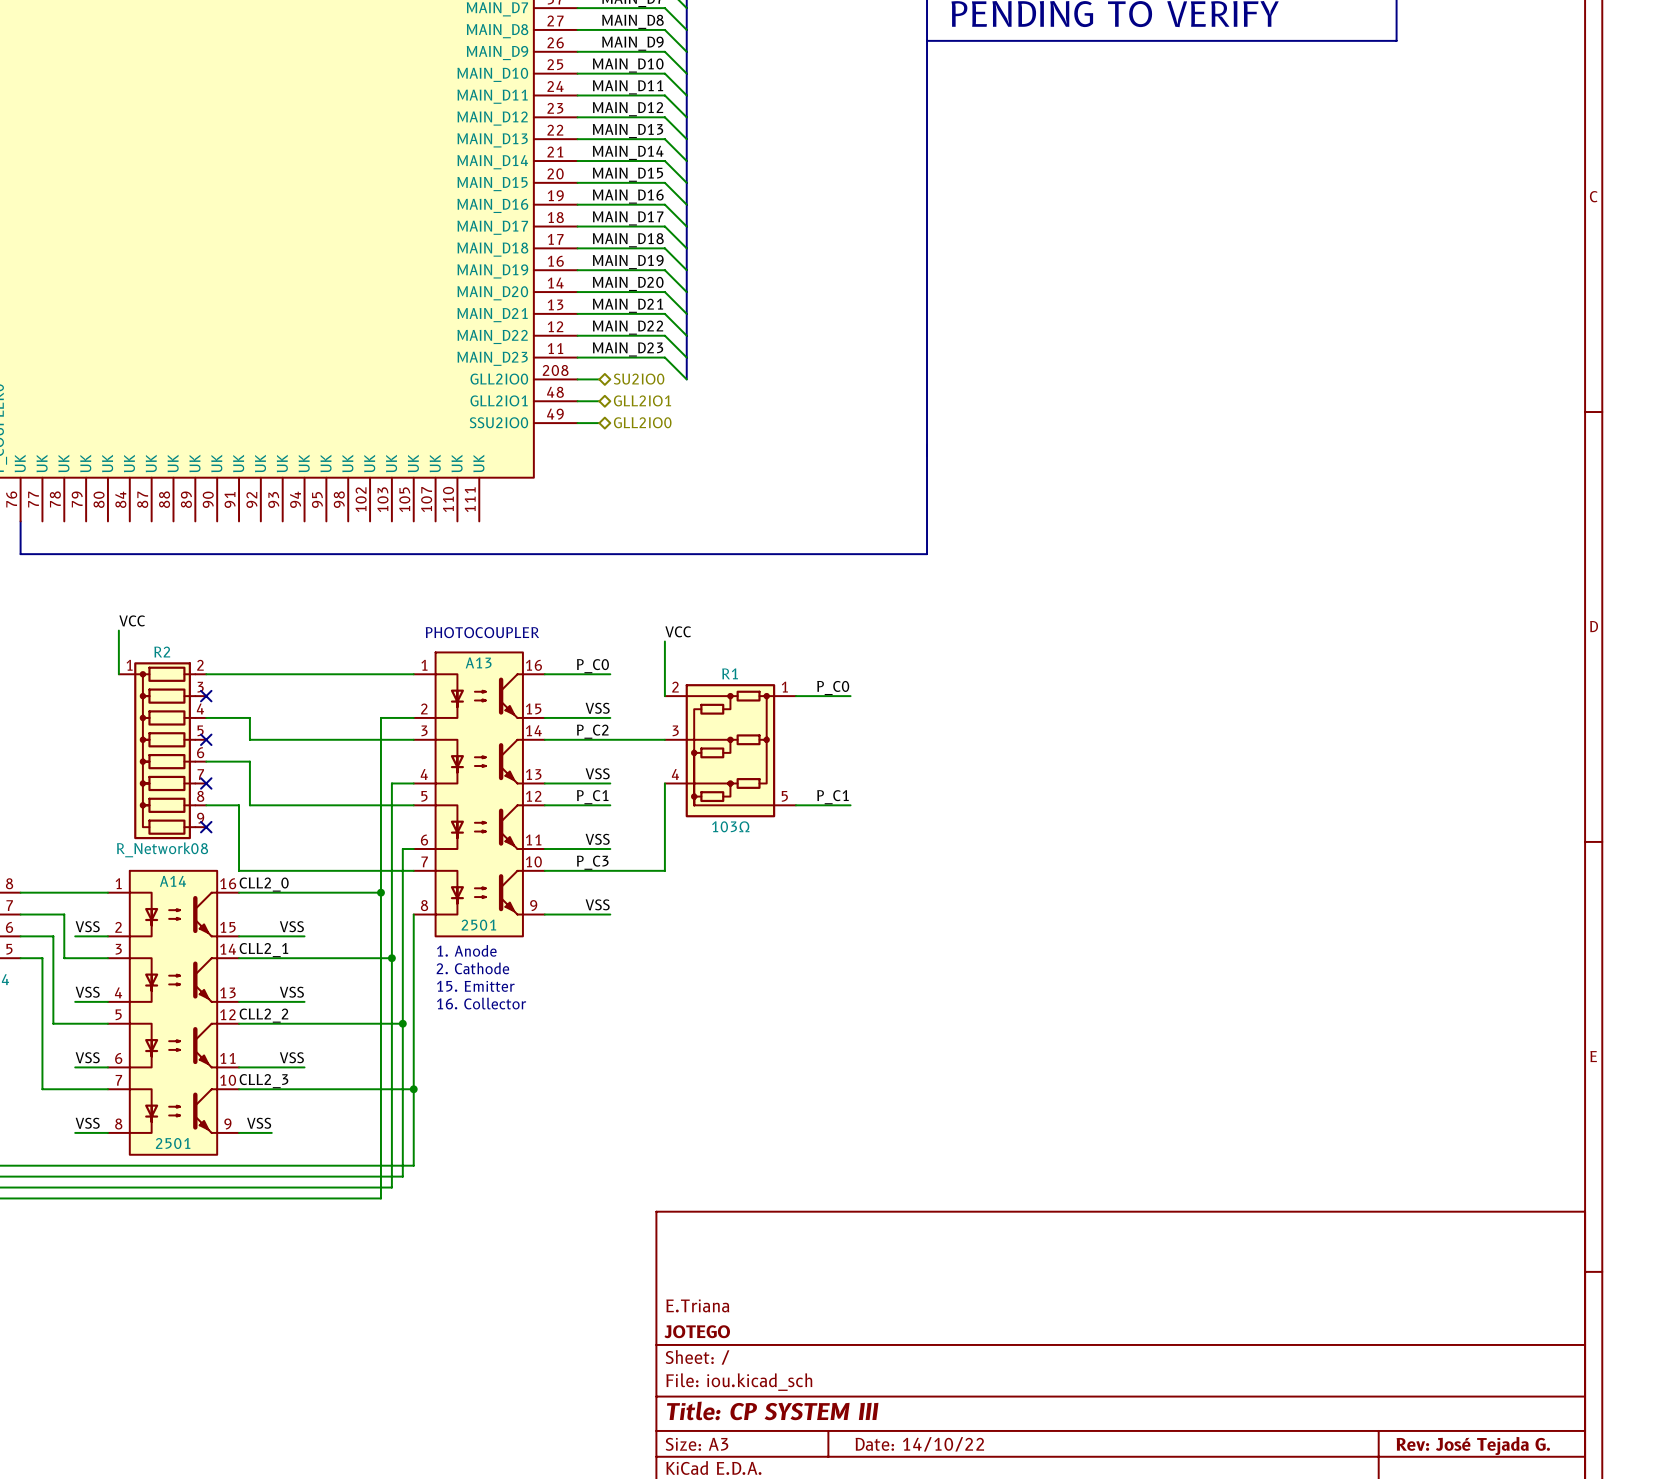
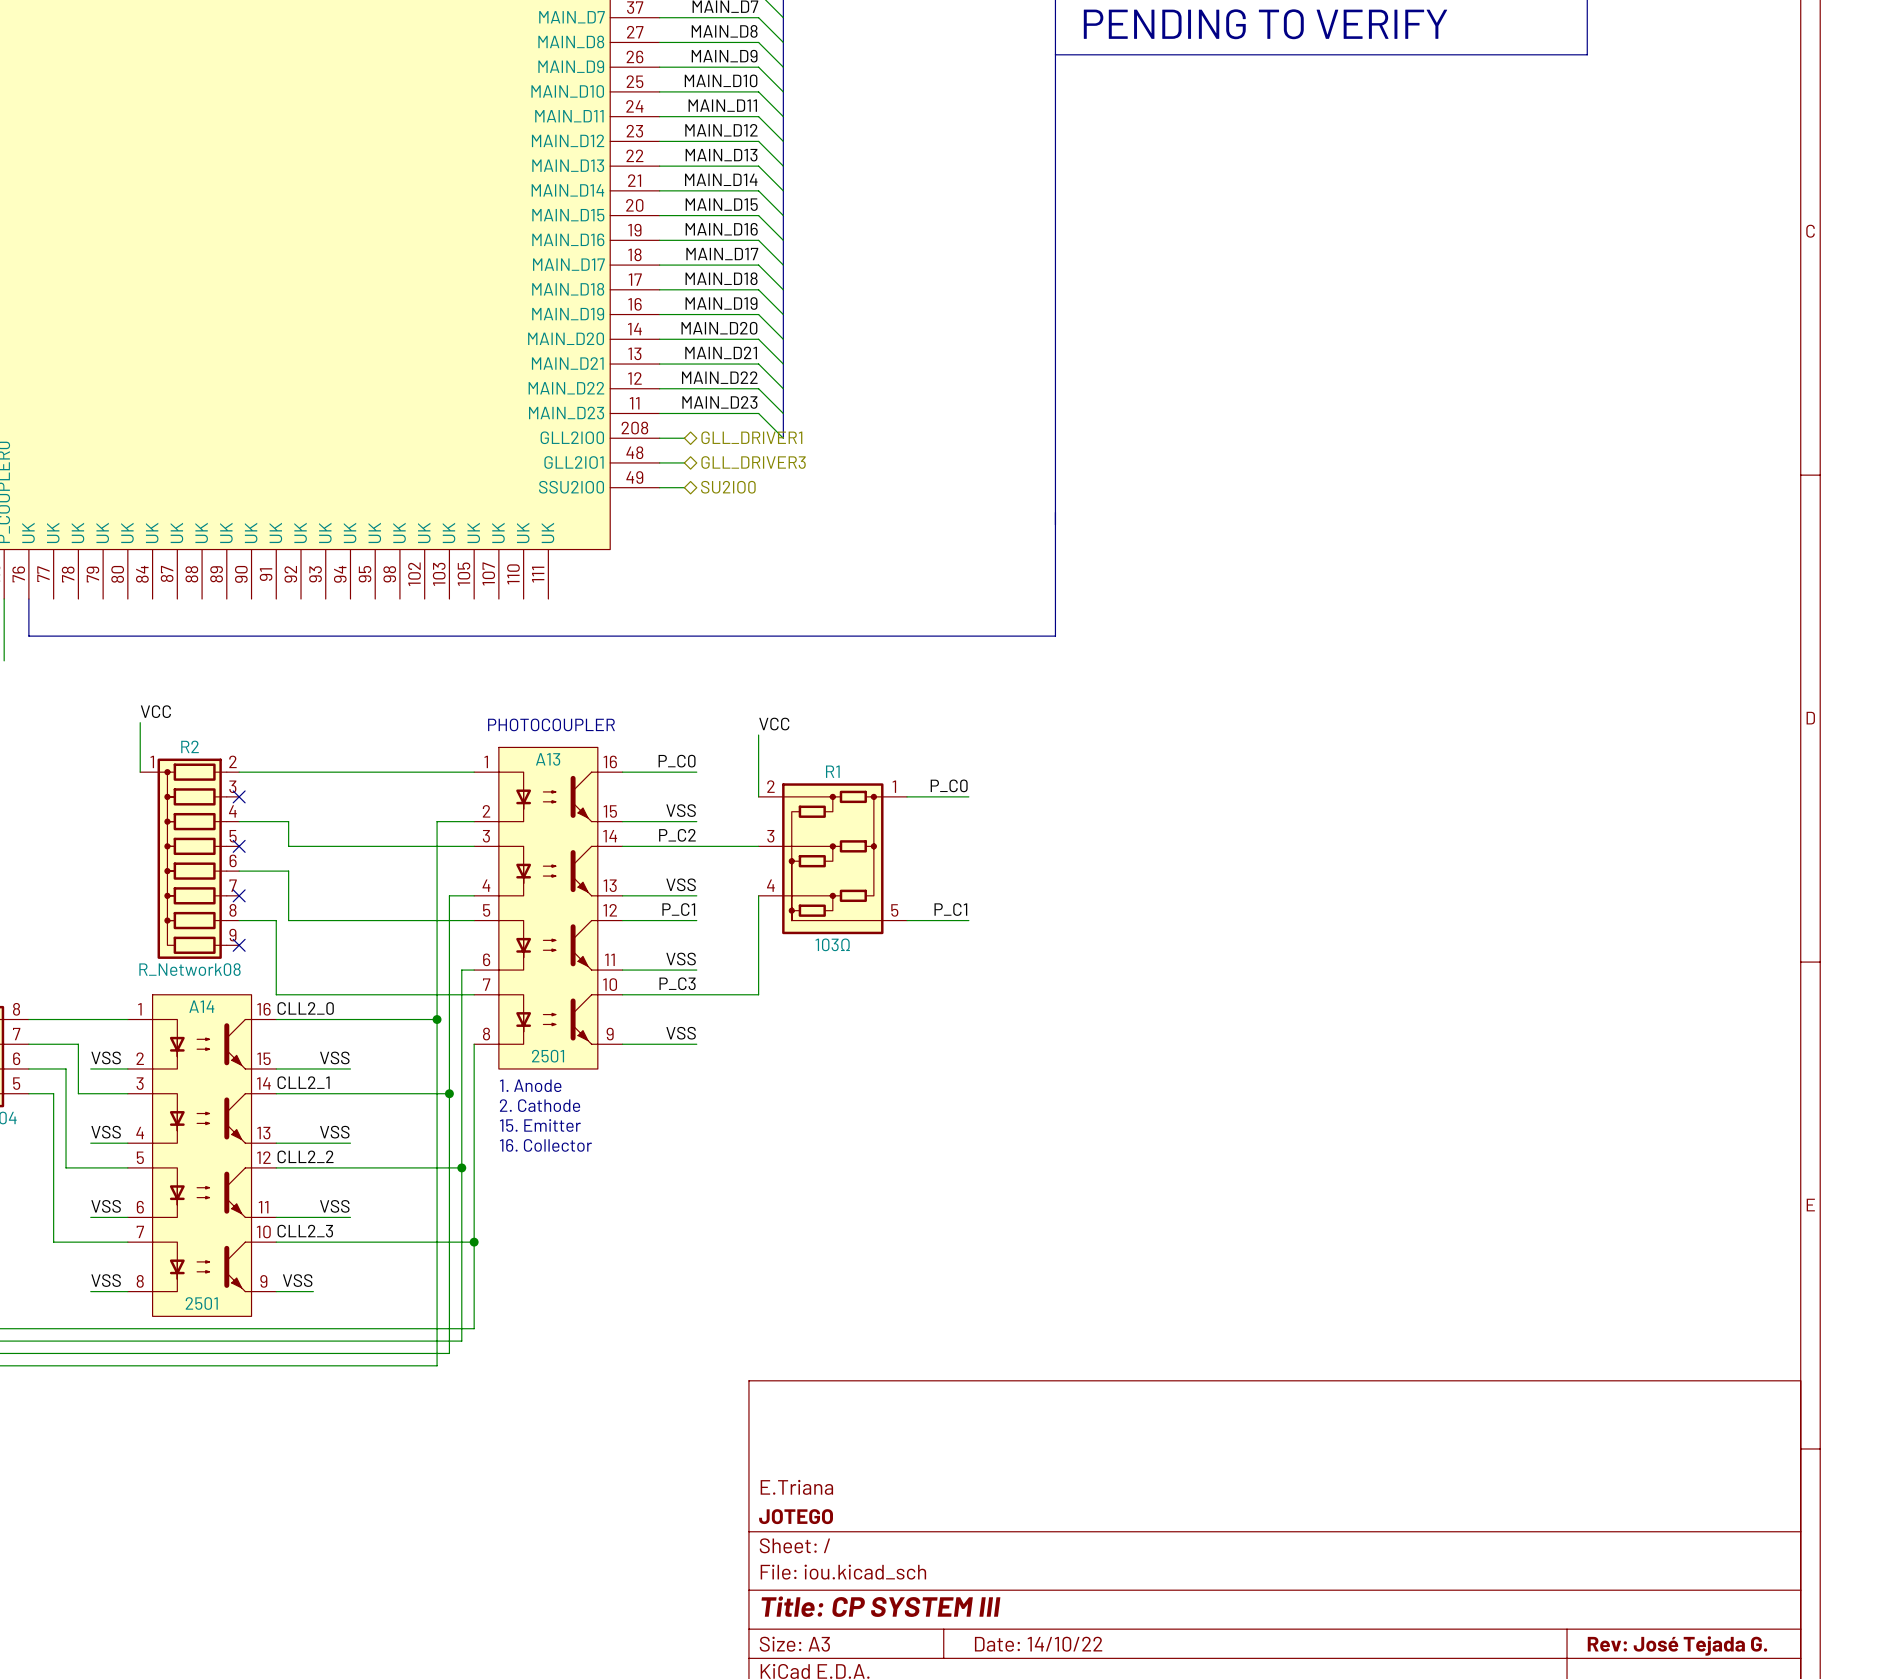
hierarchical label: SU2IO0 (639, 379) -> GLL_DRIVER1 (751, 437)
hierarchical label: GLL2IO1 (642, 400) -> GLL_DRIVER3 (753, 462)
hierarchical label: GLL2IO0 (642, 422) -> SU2IO0 (728, 487)

